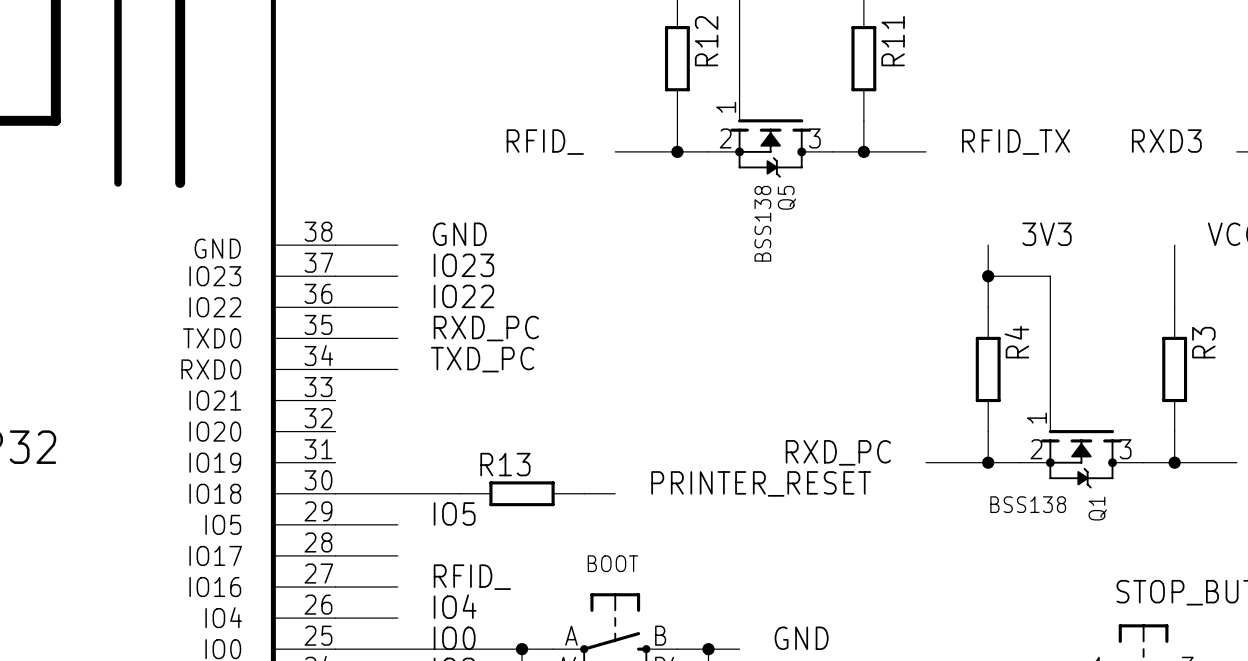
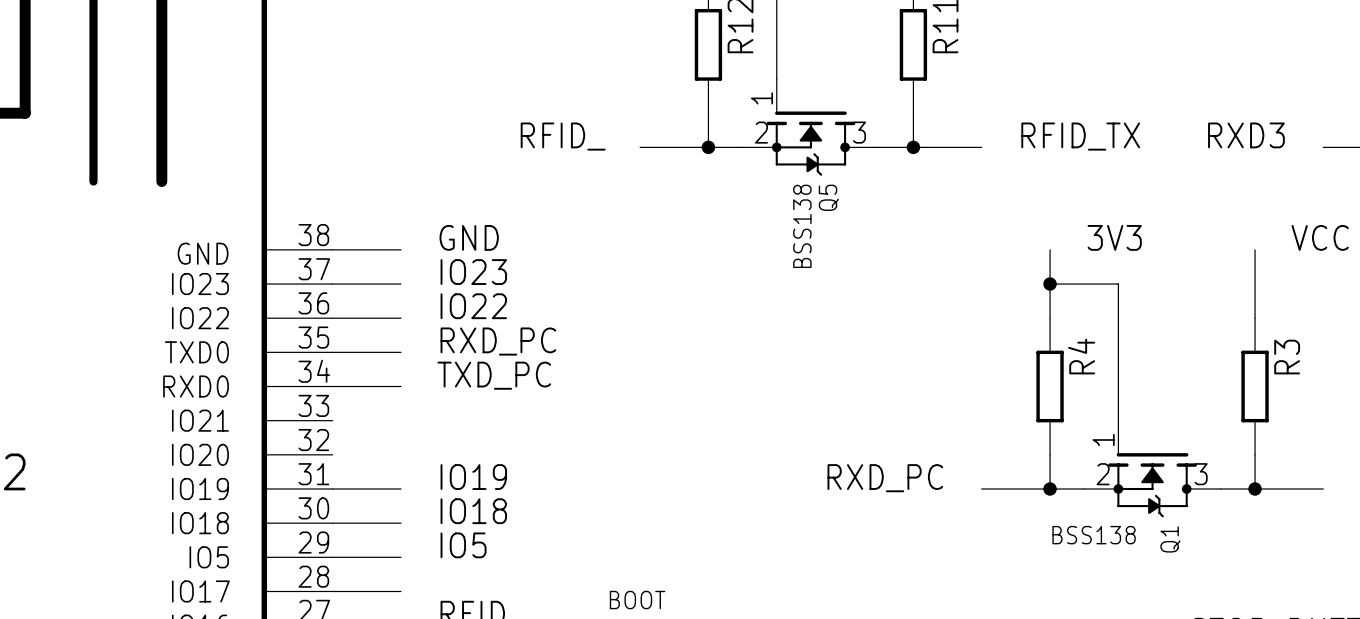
label: none -> IO19 (473, 477)
label: none -> IO18 (473, 511)
label: PRINTER_RESET (761, 483) -> none
wire: (397, 493) (459, 493) -> (332, 489) (400, 489)
R13: (522, 493) -> none
wire: (584, 493) (615, 493) -> none

